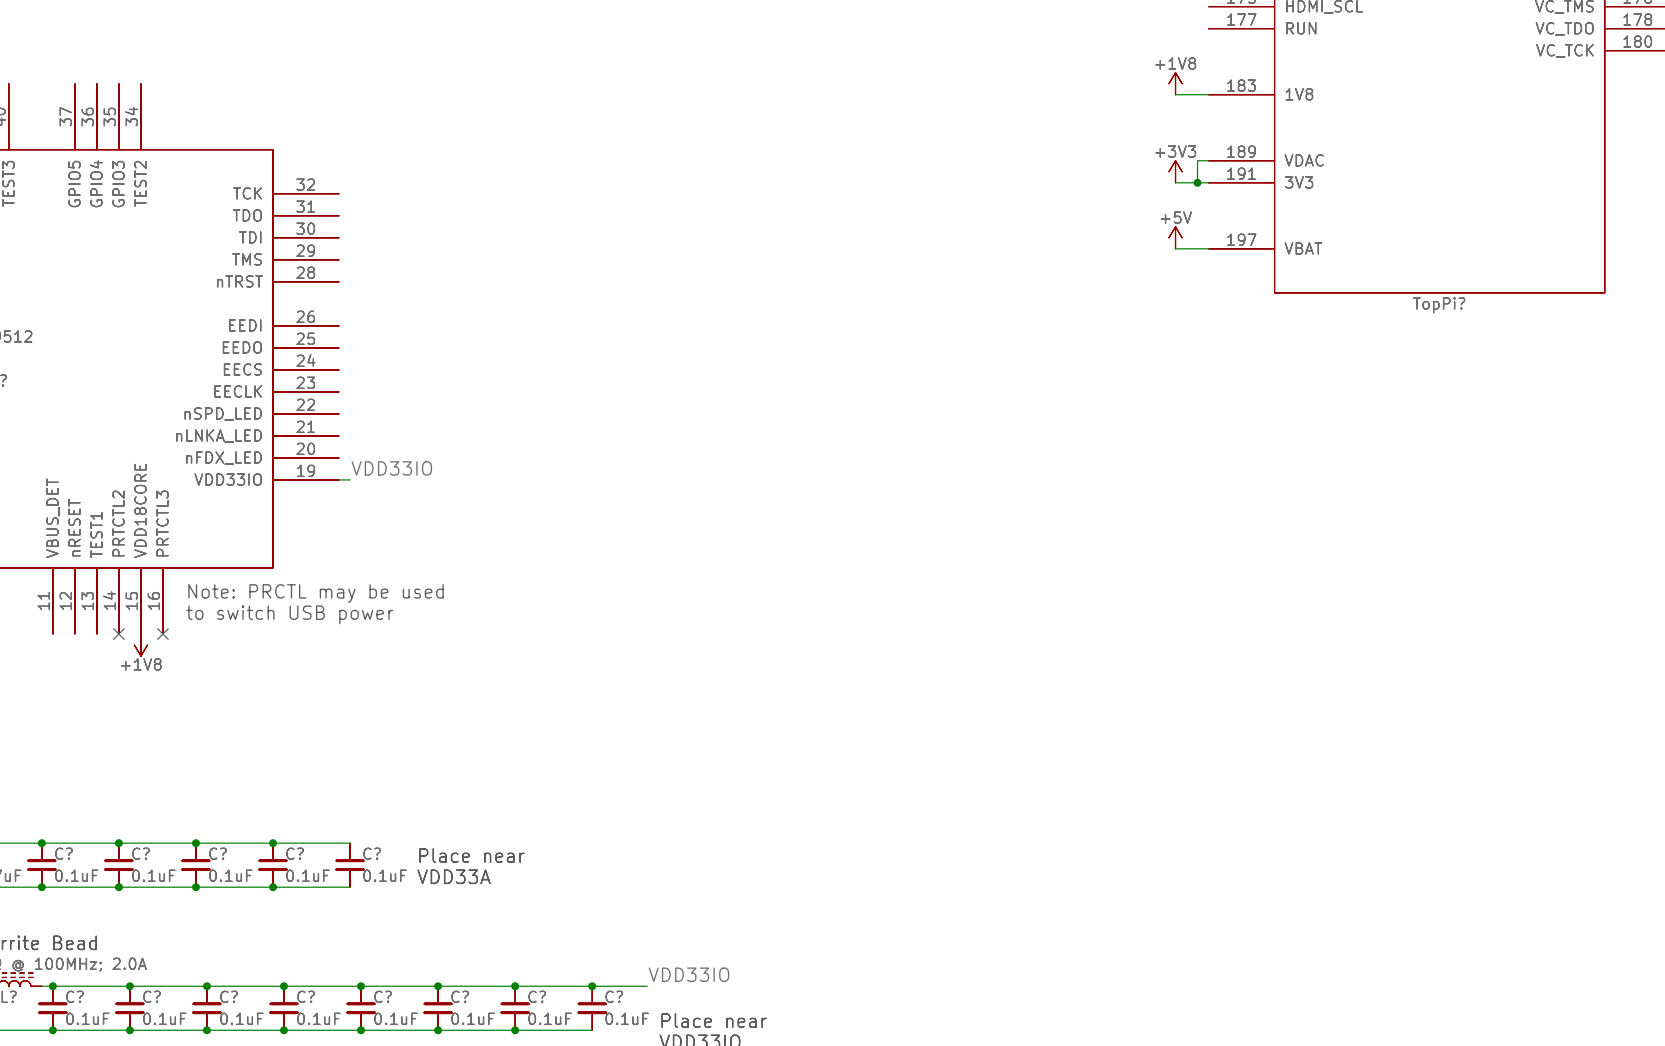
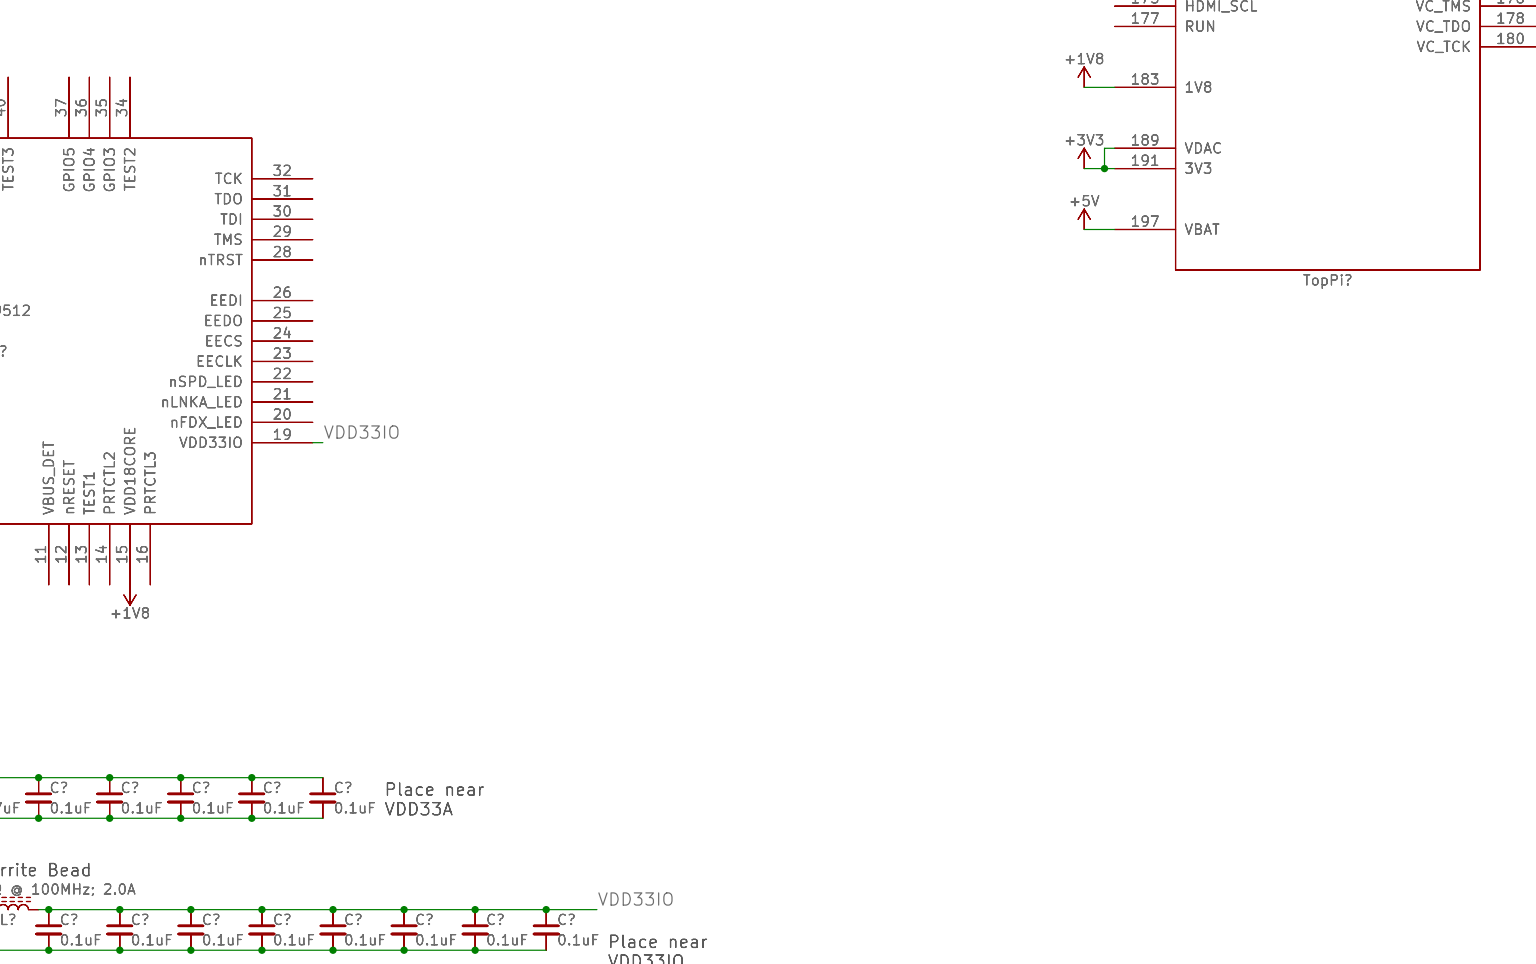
text: Note: PRCTL may be used (316, 593) -> none
text: to switch USB power (289, 614) -> none
no-connect mark: (118, 634) -> none
no-connect mark: (162, 634) -> none

